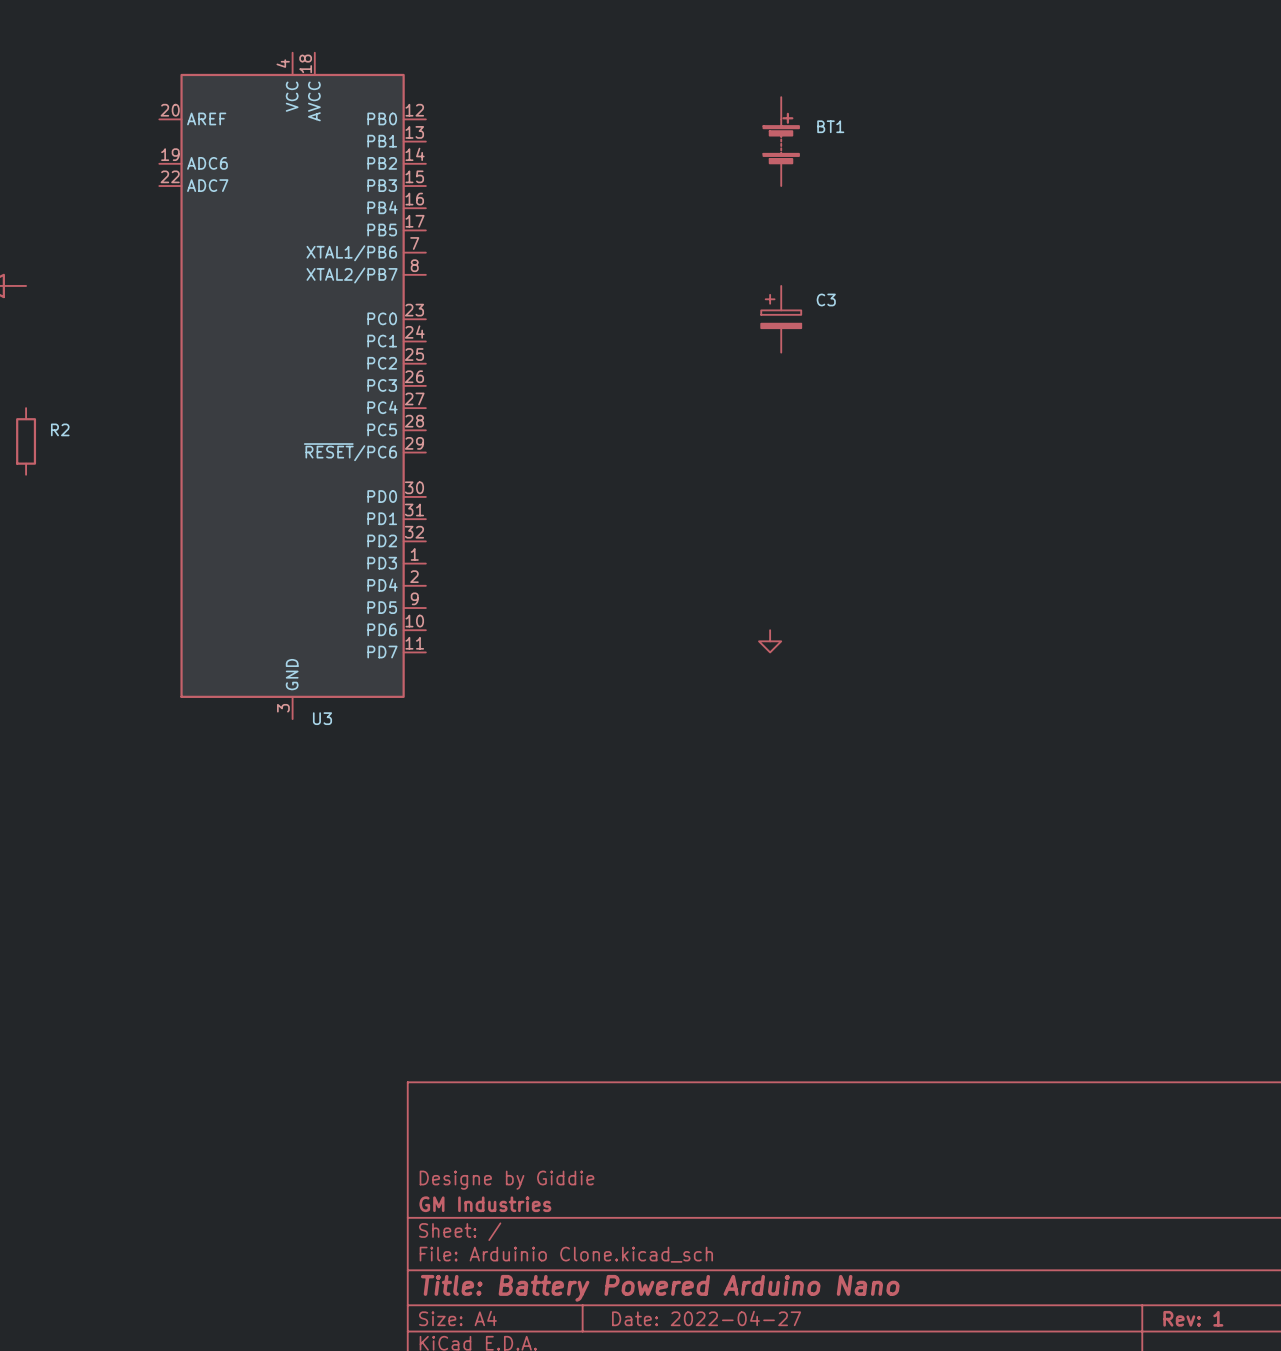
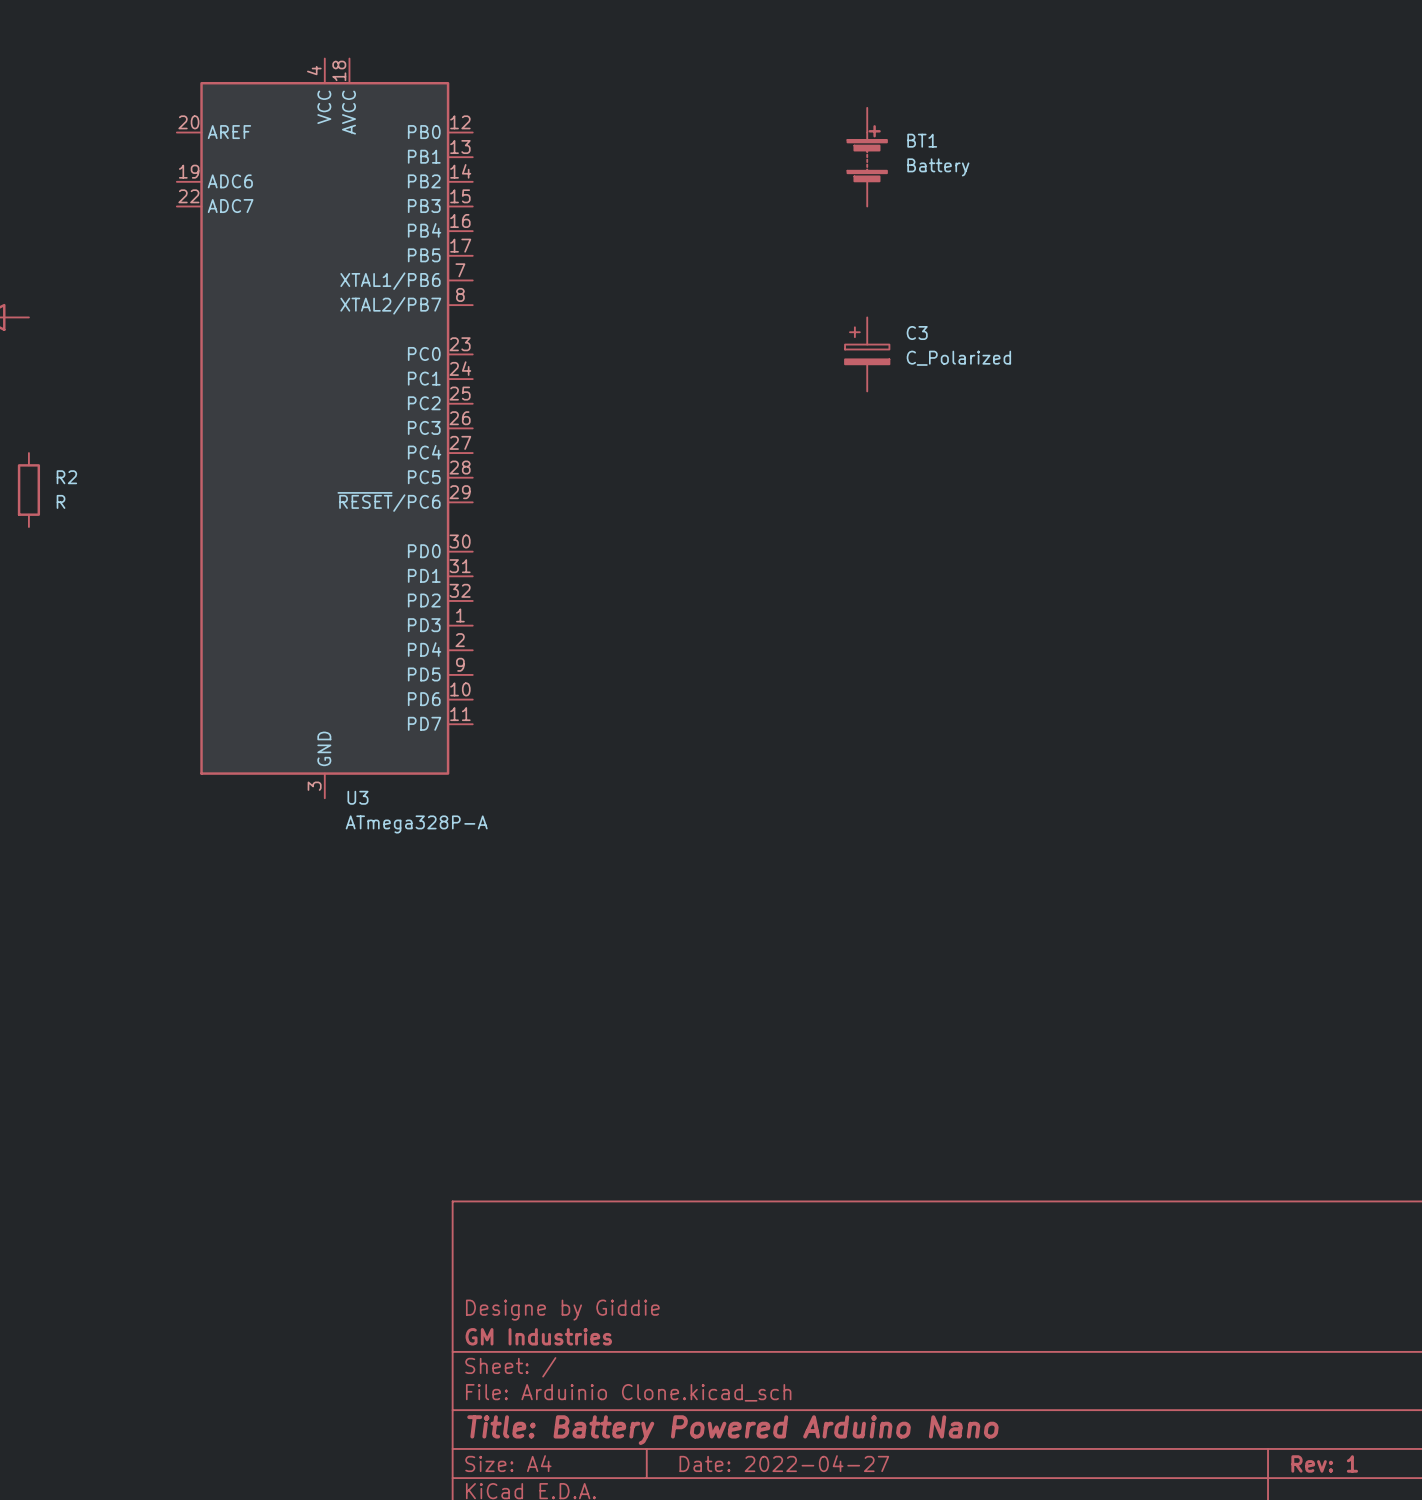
BT1 value: none -> Battery (938, 167)
C3 value: none -> C_Polarized (958, 358)
R2 value: none -> R (61, 501)
power symbol: (770, 641) -> none
U3 value: none -> ATmega328P-A (416, 824)

